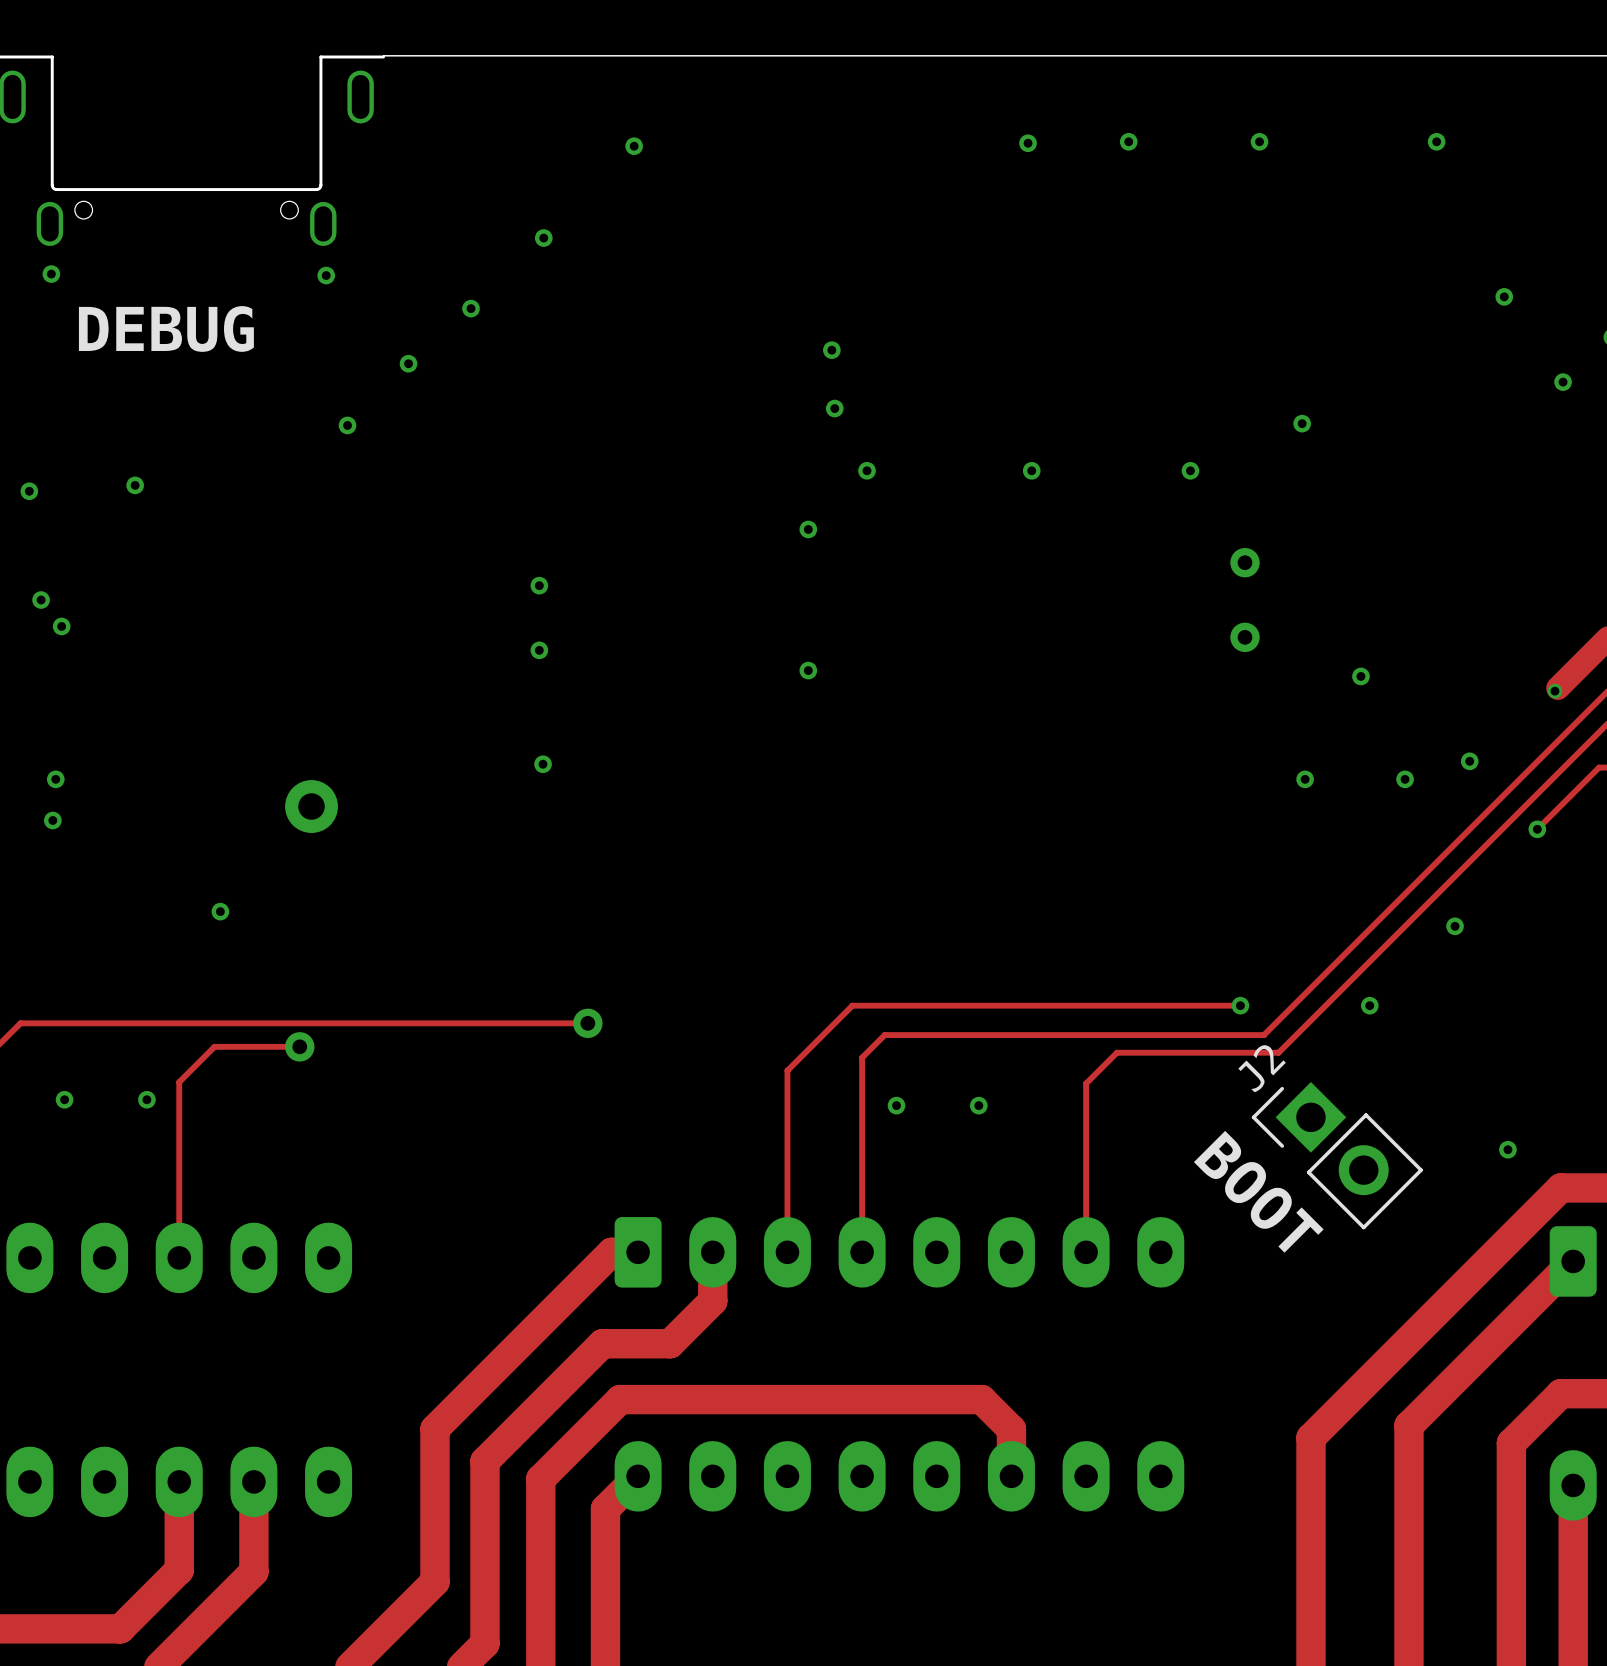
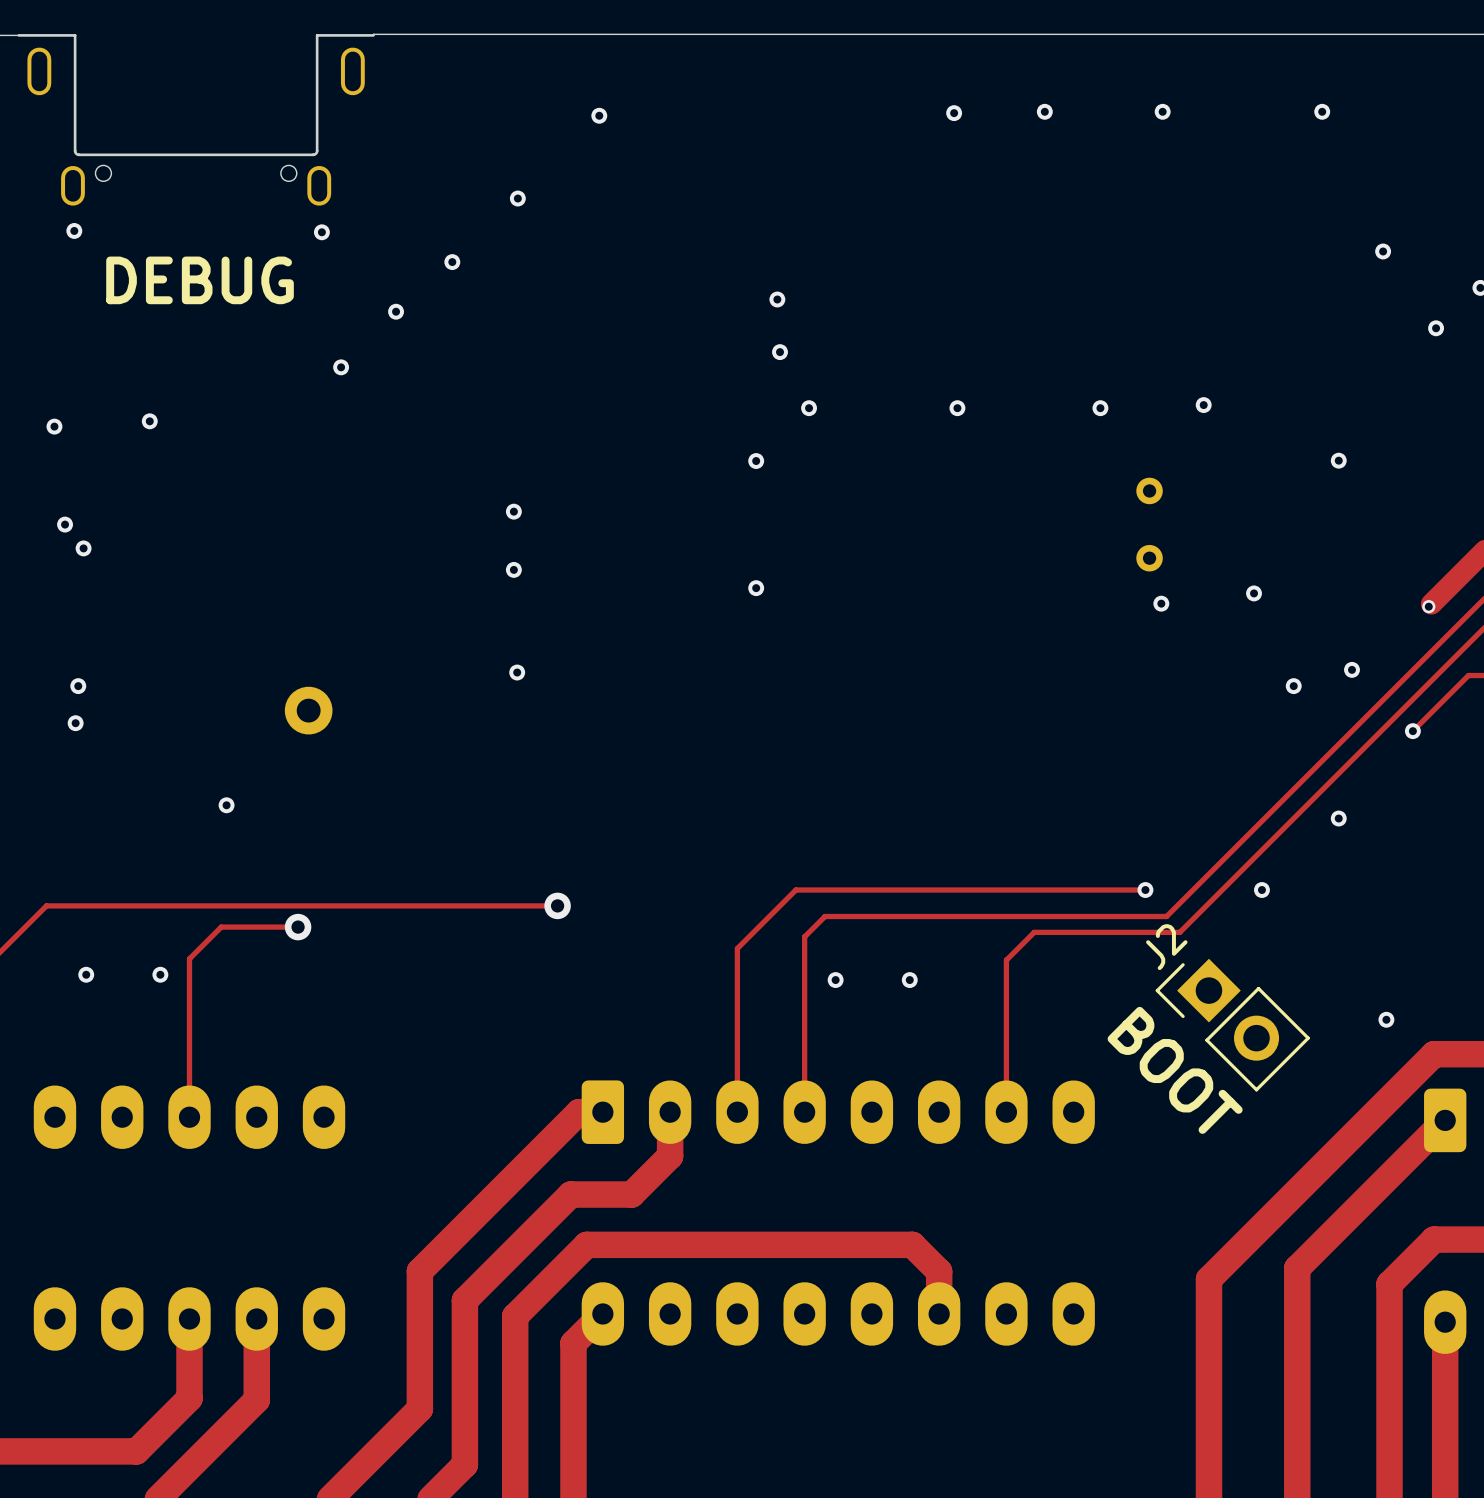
via position: (1302, 423) -> (1203, 405)
via: none -> (1338, 460)
via position: (1305, 779) -> (1161, 603)

